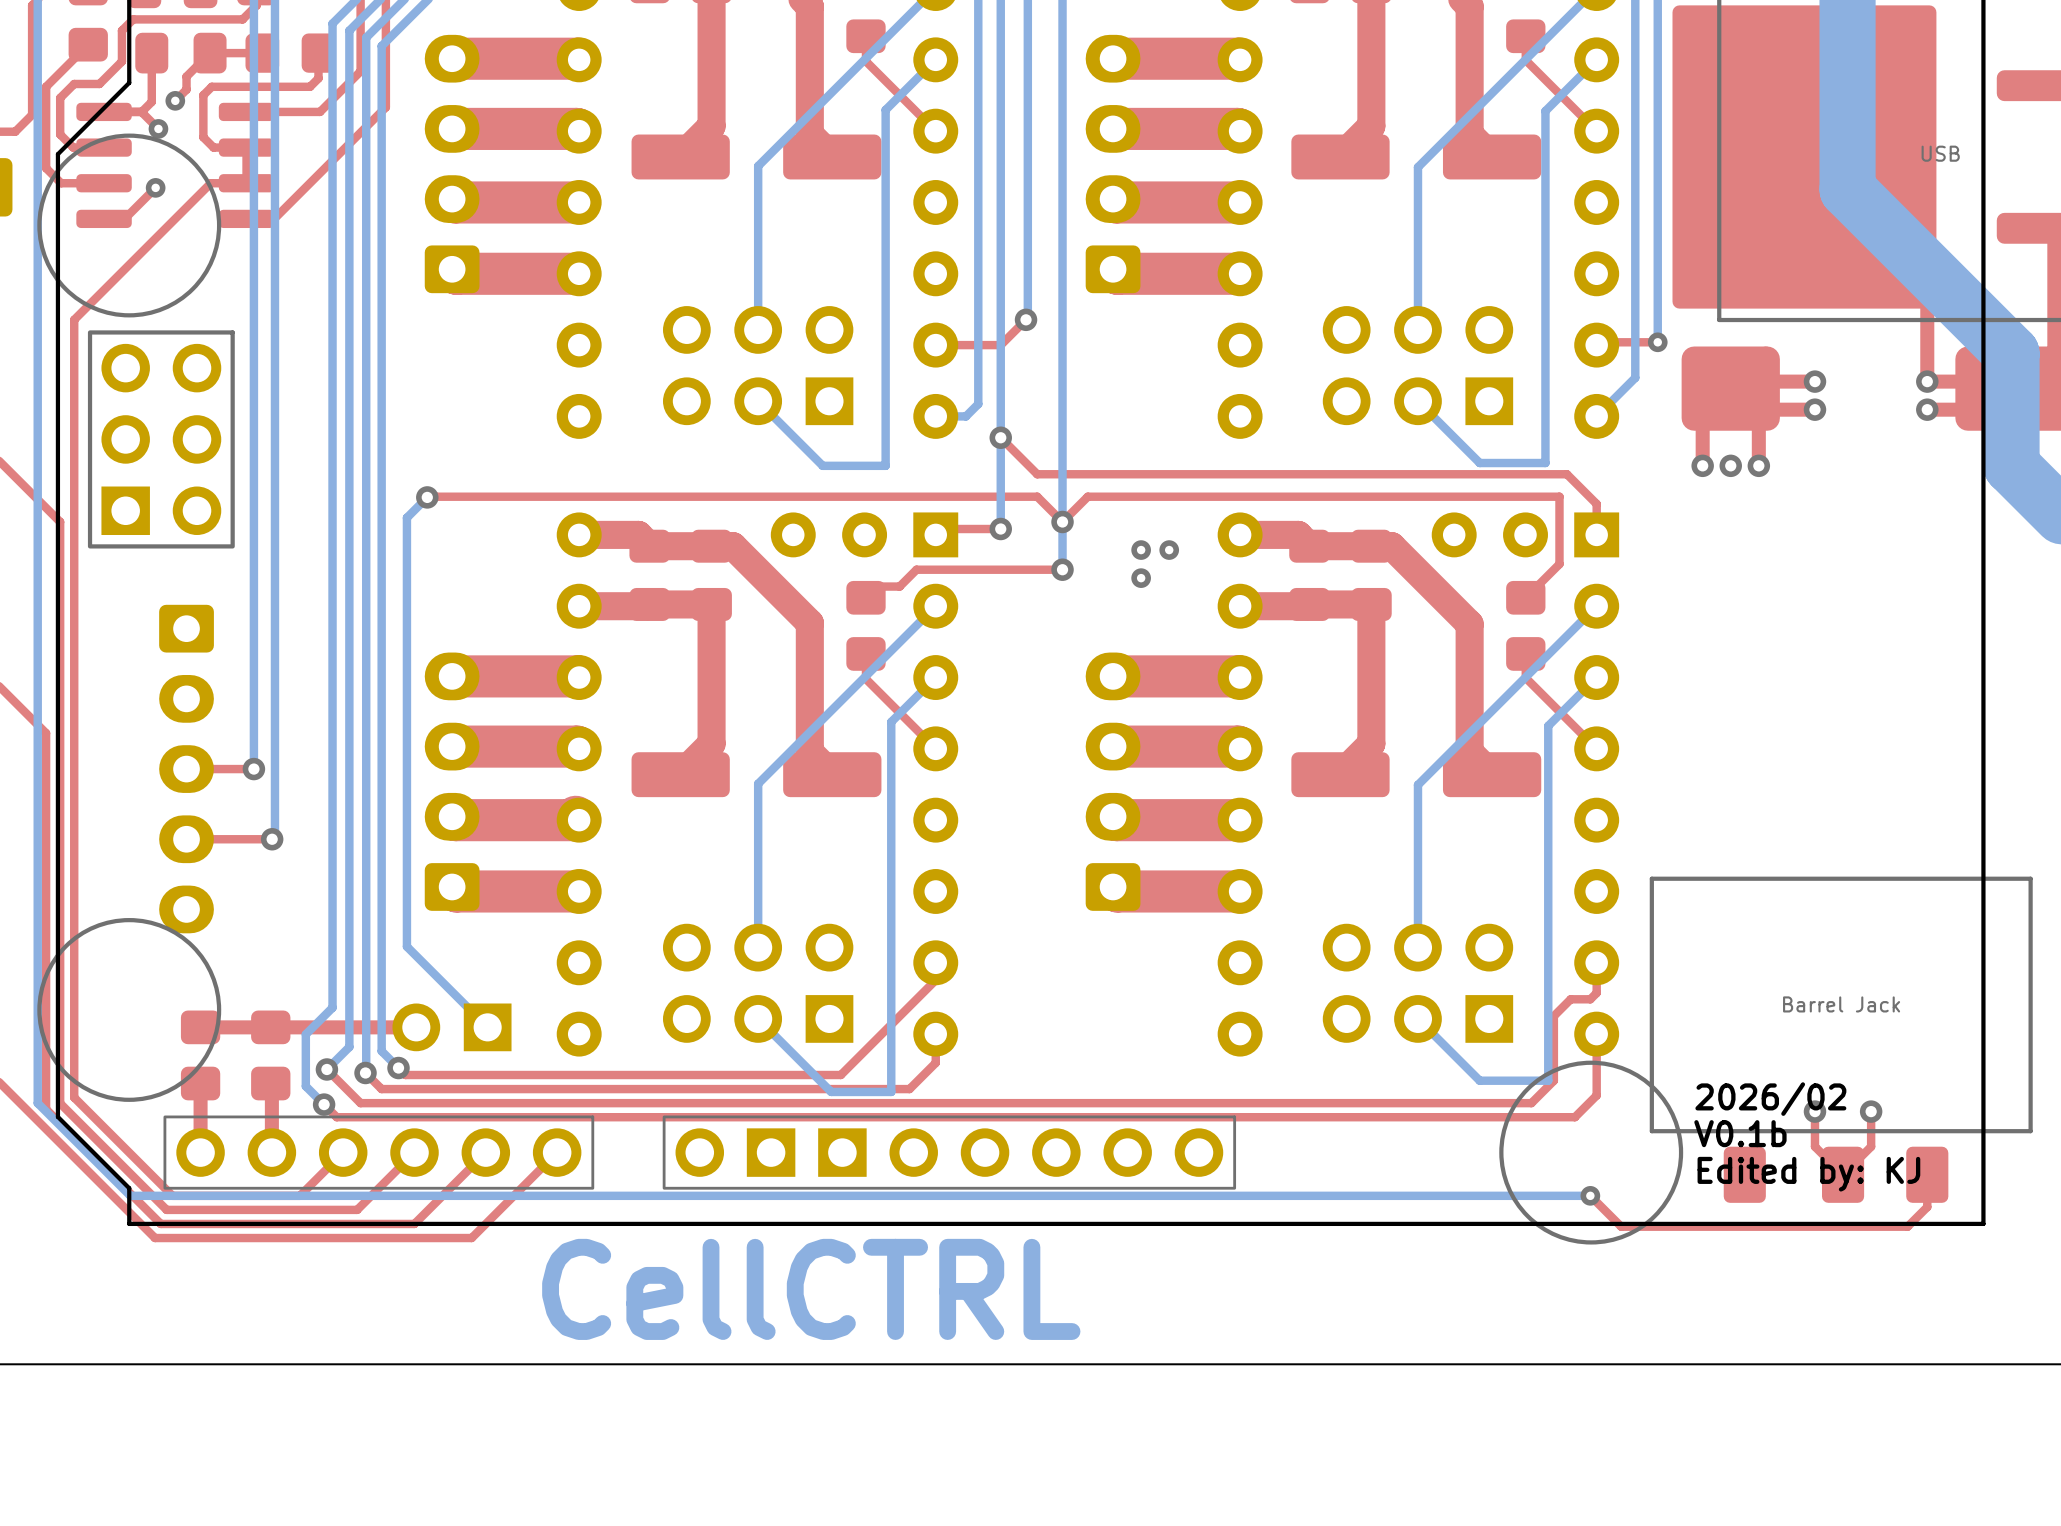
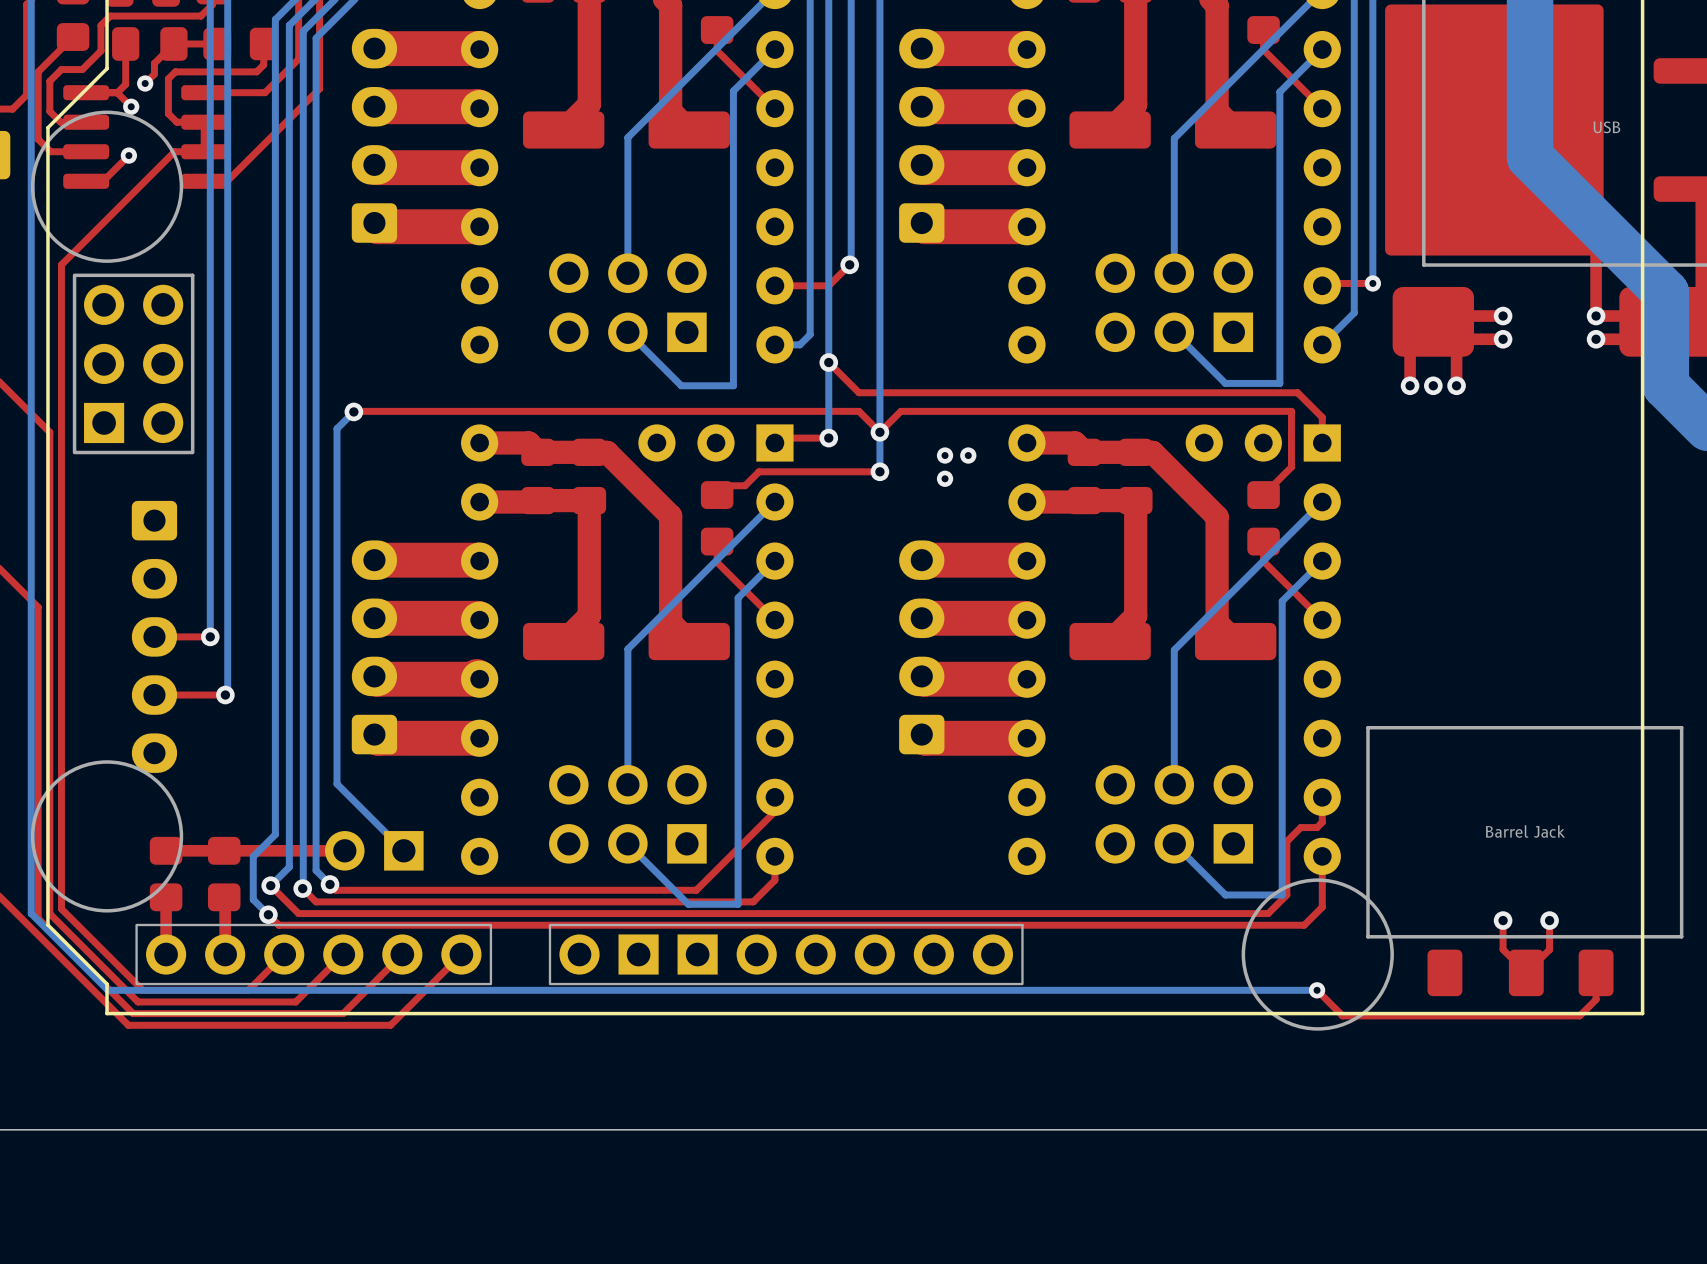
text: 2026/02 (1770, 1099) -> none
text: V0.1b (1740, 1133) -> none
text: Edited by: KJ (1808, 1174) -> none
text: CellCTRL (811, 1289) -> none

